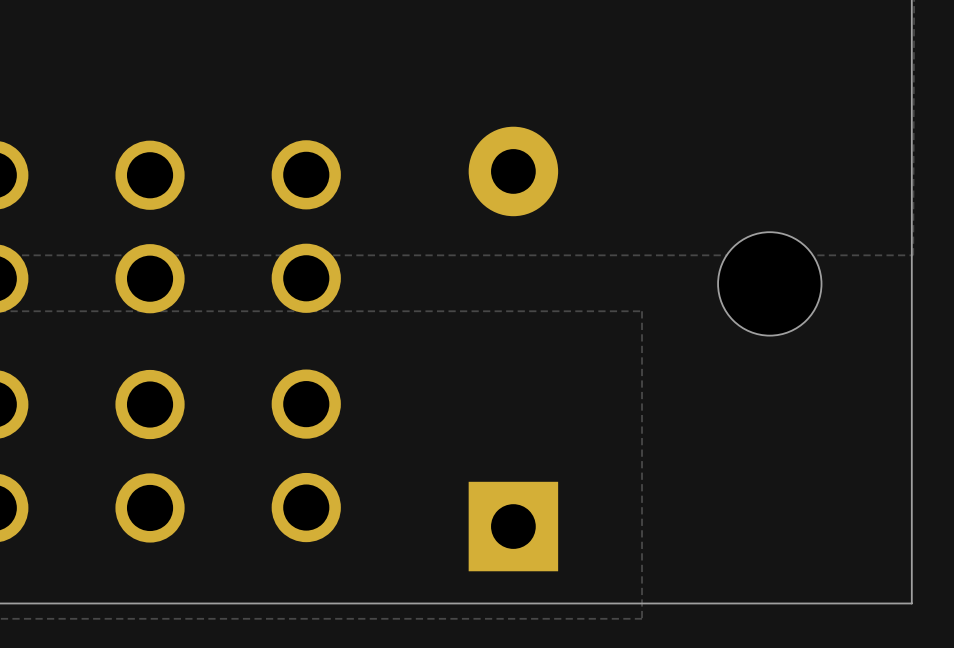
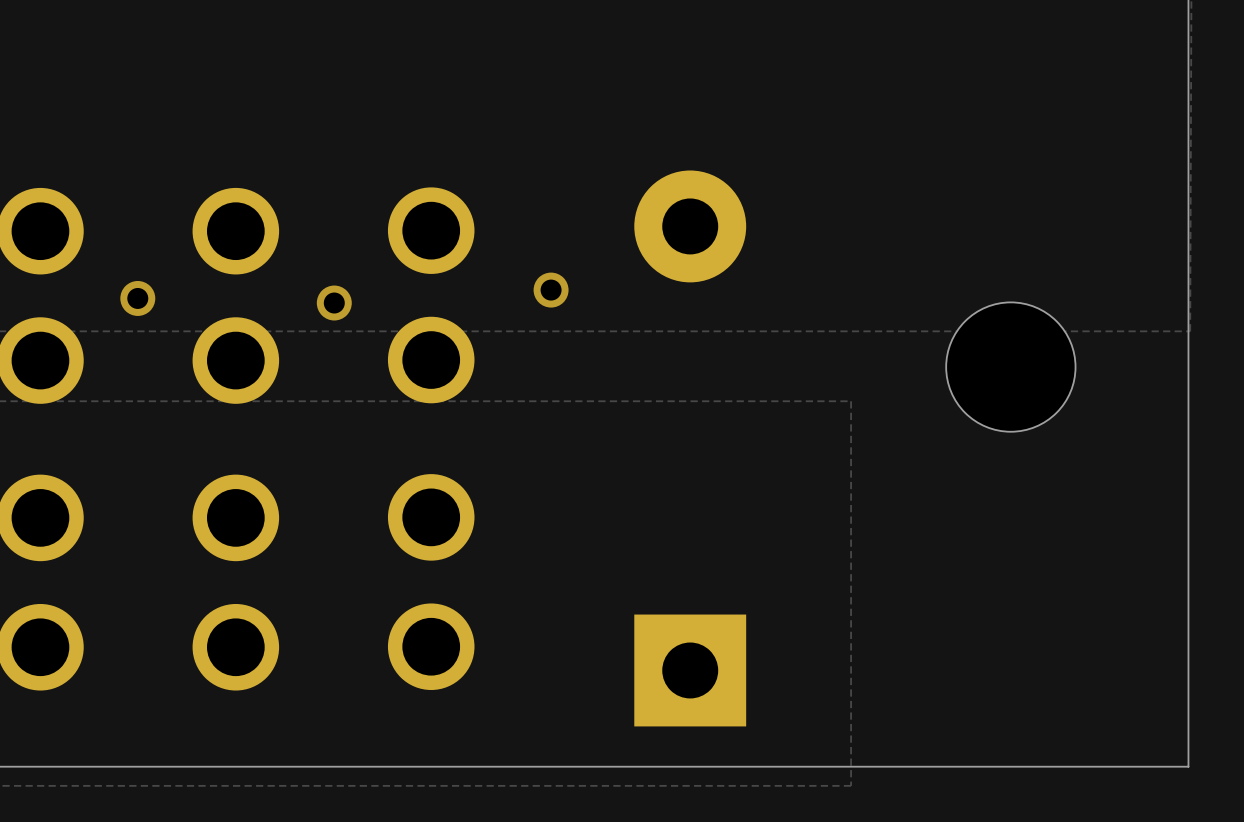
via: none -> (551, 290)
via: none -> (137, 298)
via: none -> (334, 303)

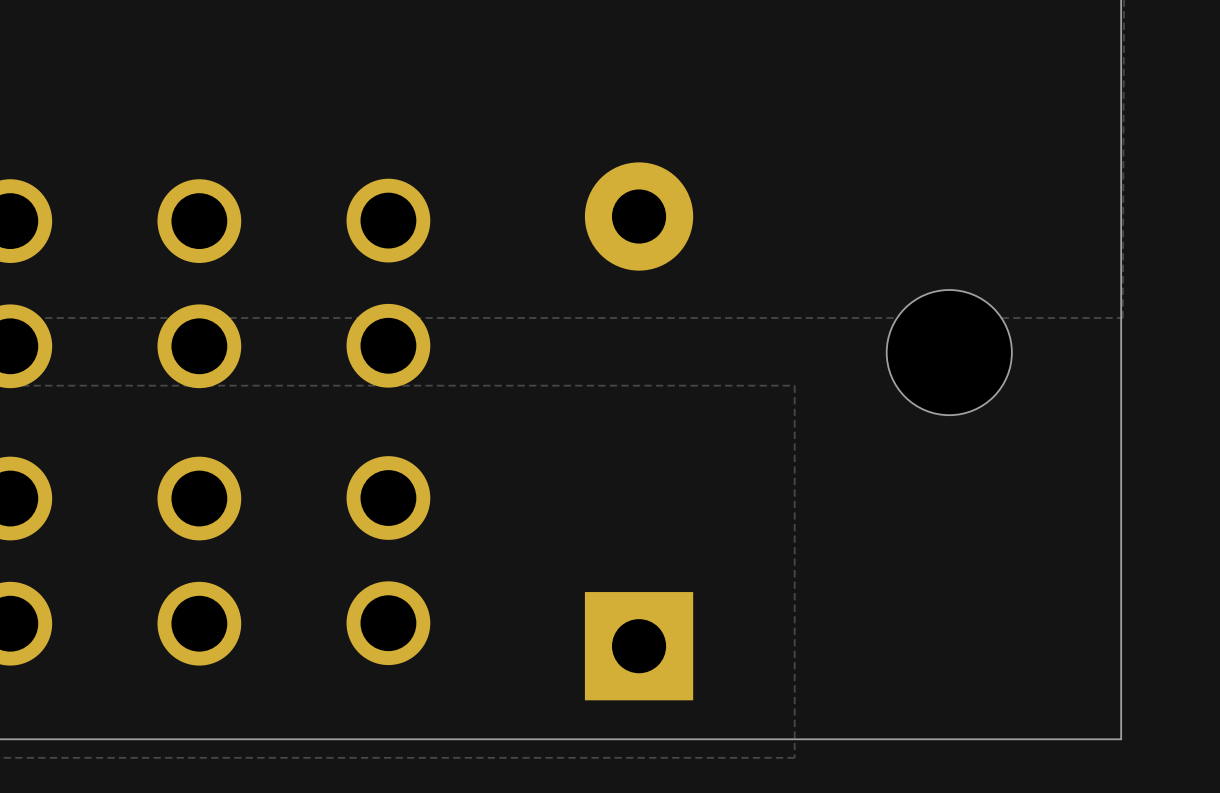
via: (551, 290) -> none
via: (137, 298) -> none
via: (334, 303) -> none

